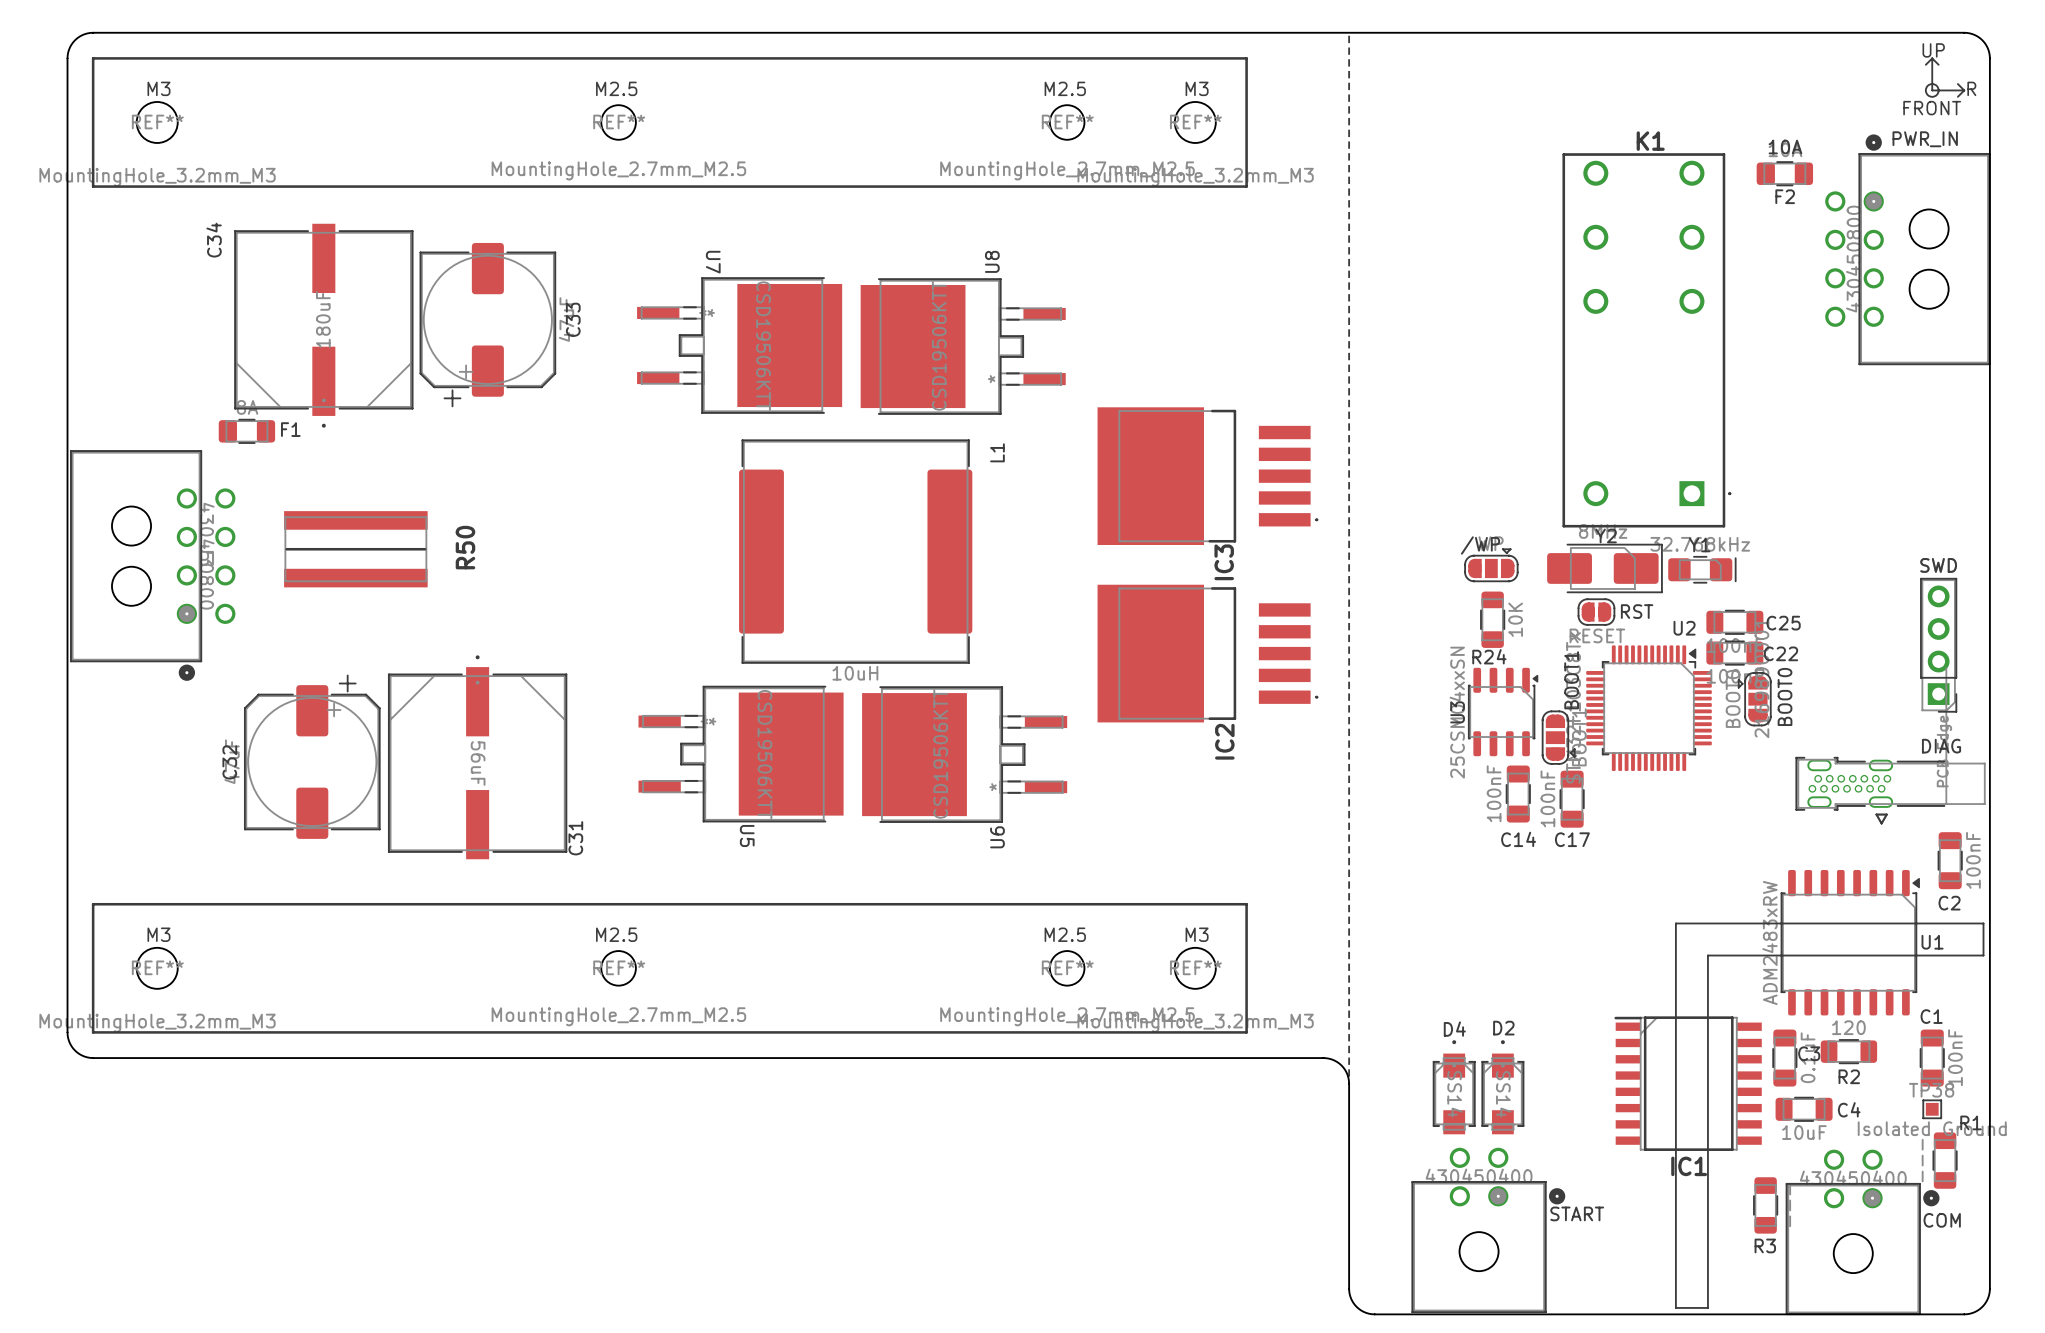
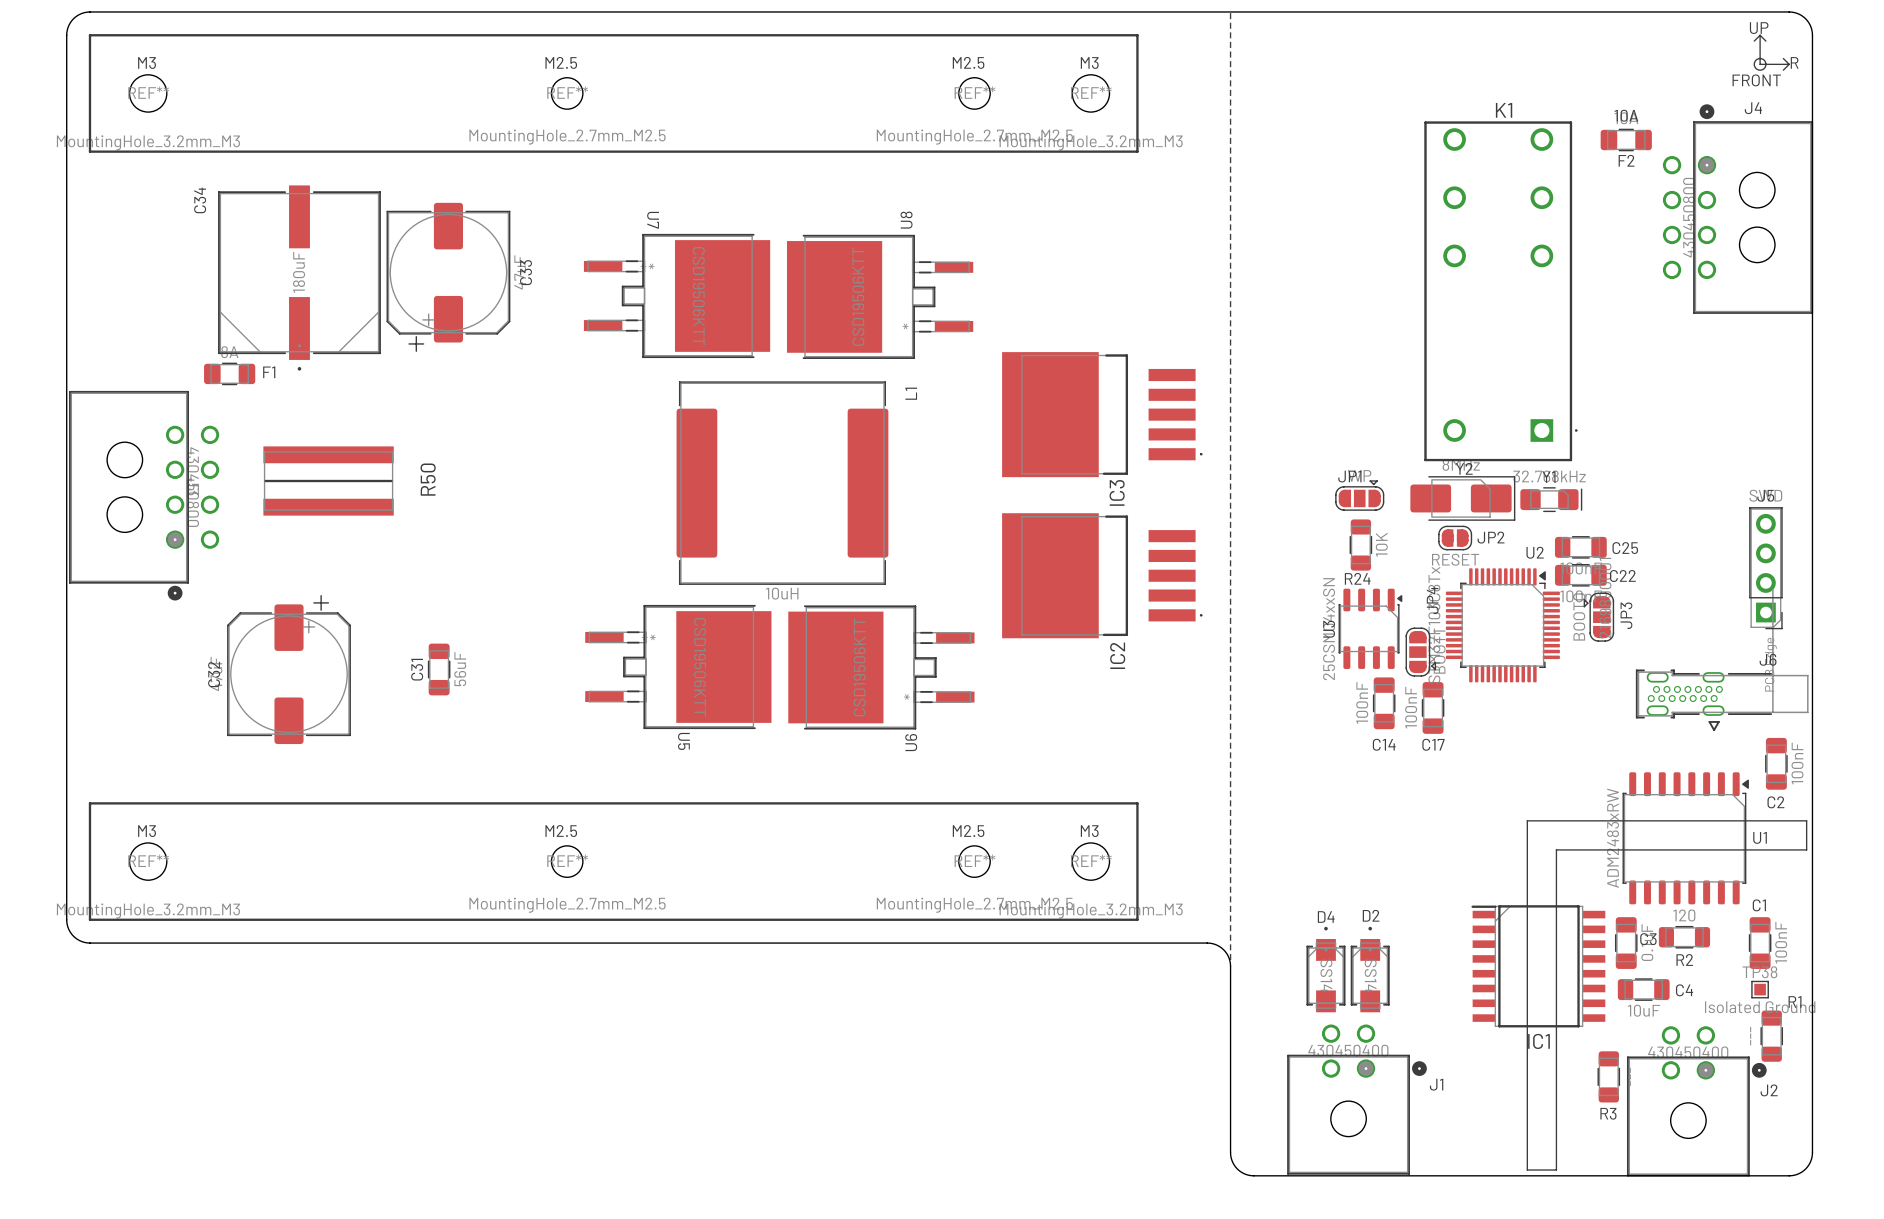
PWR_IN name: PWR_IN (1925, 139) -> J4 (1753, 108)
/WP name: /WP (1480, 545) -> JP1 (1349, 476)
SWD name: SWD (1938, 565) -> J5 (1765, 495)
RST name: RST (1637, 611) -> JP2 (1491, 537)
C31 footprint: [387, 655, 568, 860] -> [427, 643, 451, 696]
BOOT1 name: BOOT1 (1571, 680) -> JP4 (1432, 600)
BOOT0 name: BOOT0 (1785, 696) -> JP3 (1626, 615)
DIAG name: DIAG (1941, 746) -> J6 (1768, 659)
C31 name position: C31 (575, 838) -> C31 (417, 669)
START name: START (1577, 1213) -> J1 (1436, 1084)
COM name: COM (1942, 1220) -> J2 (1769, 1090)

